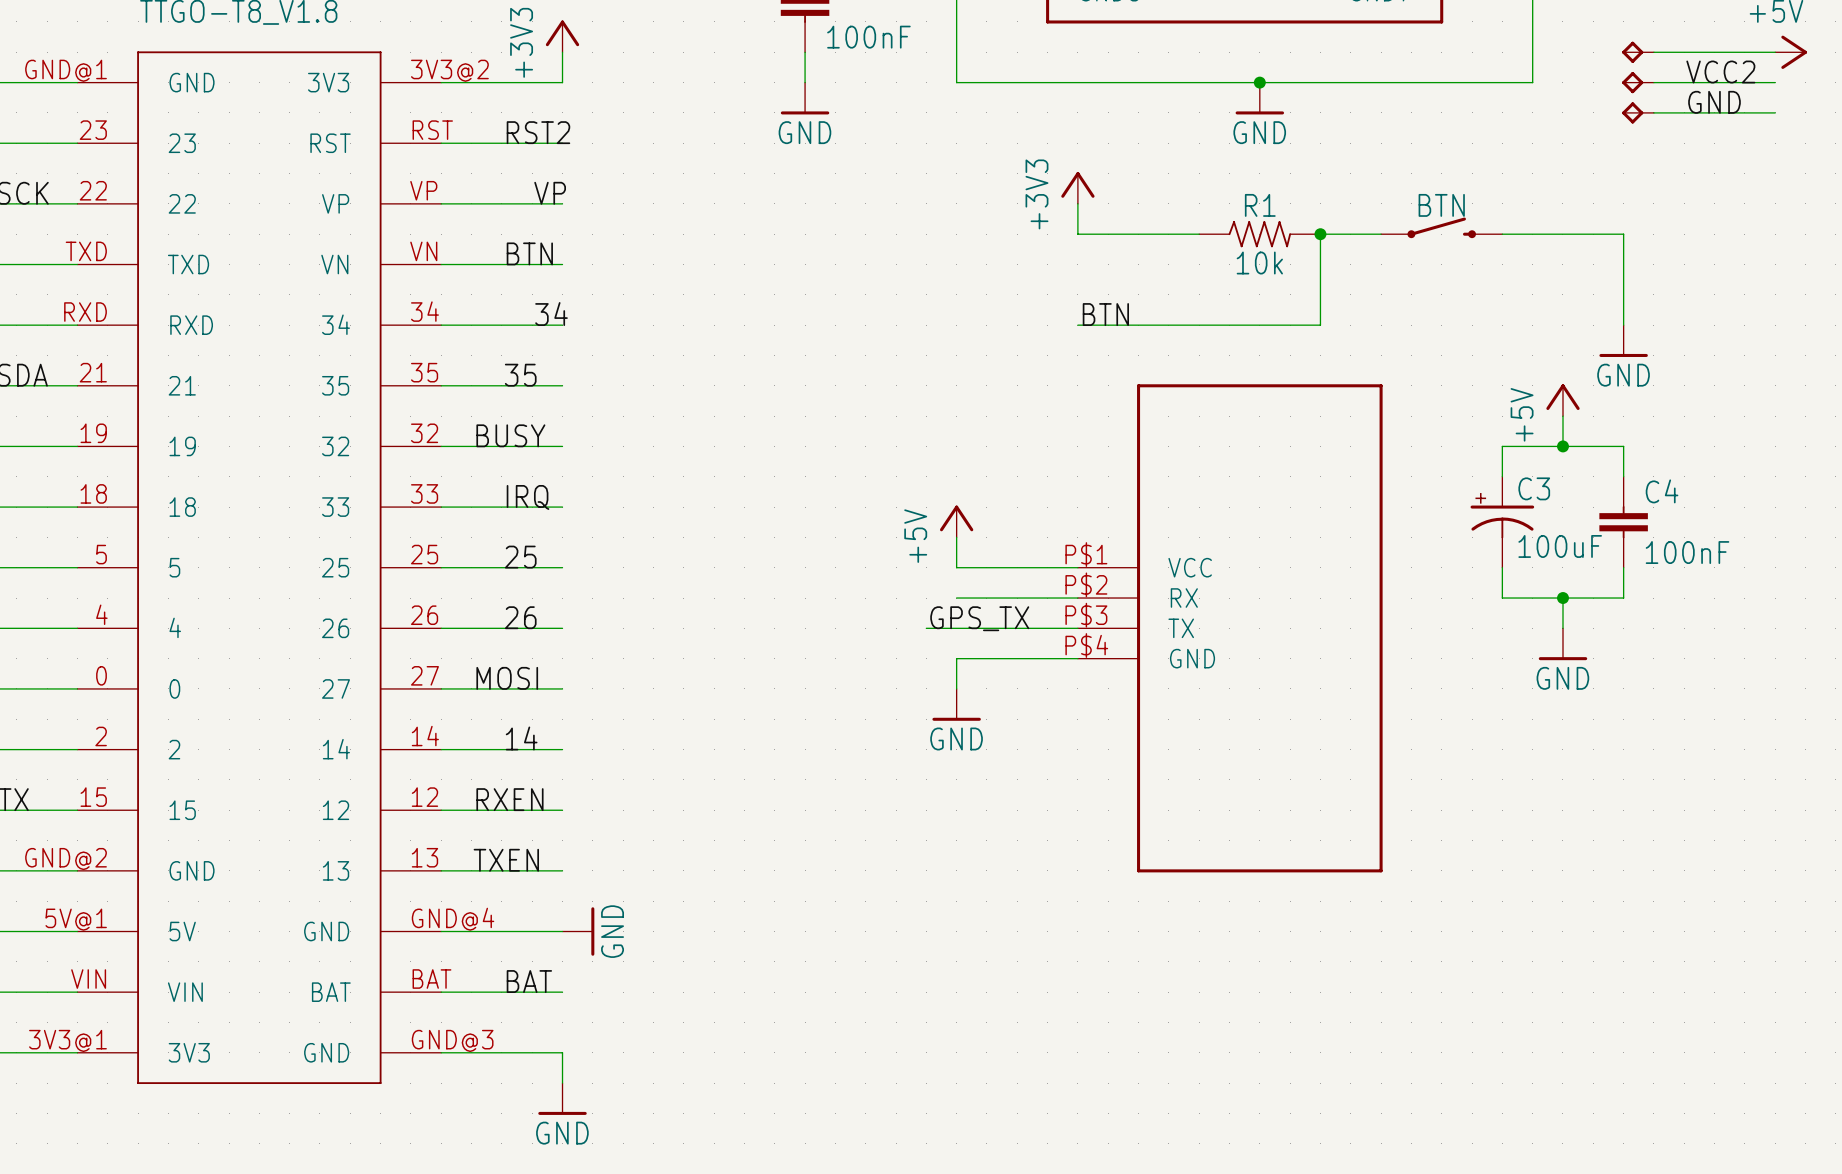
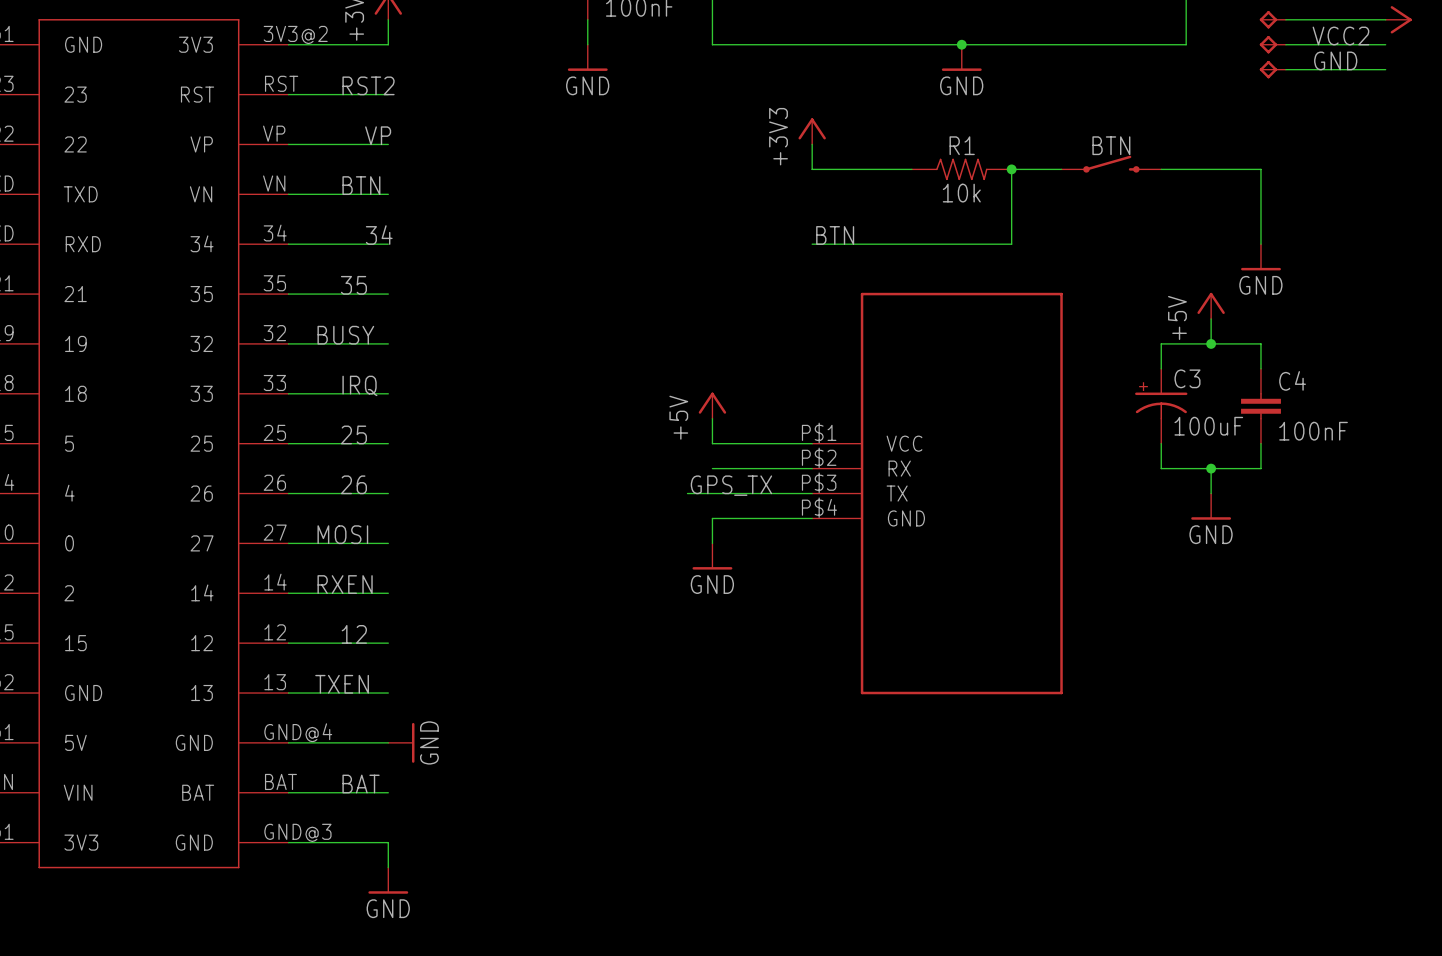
label: 14 (521, 738) -> none
label position: RXEN (509, 799) -> RXEN (345, 584)
label: none -> 12 (354, 634)

